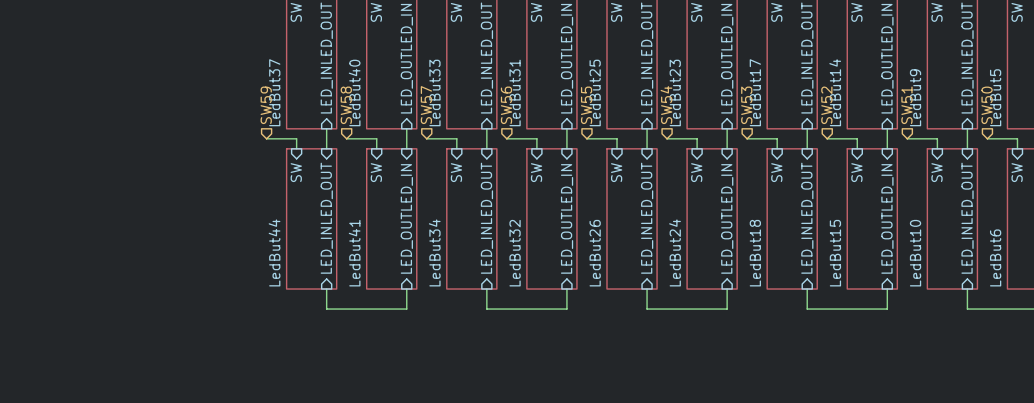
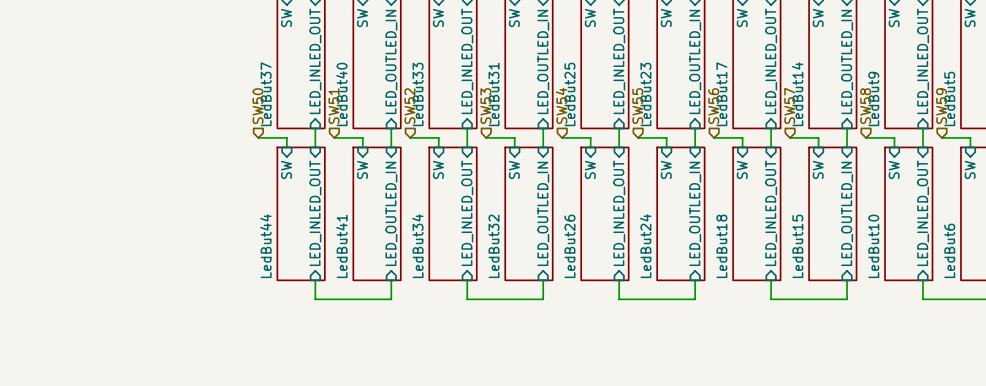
hierarchical label: SW59 (266, 105) -> SW50 (258, 106)
hierarchical label: SW58 (346, 105) -> SW51 (333, 106)
hierarchical label: SW57 (426, 105) -> SW52 (409, 106)
hierarchical label: SW56 (506, 105) -> SW53 (485, 106)
hierarchical label: SW55 (586, 105) -> SW54 (561, 105)
hierarchical label: SW54 (666, 105) -> SW55 (637, 106)
hierarchical label: SW53 (746, 105) -> SW56 (713, 106)
hierarchical label: SW52 (826, 105) -> SW57 (789, 105)
hierarchical label: SW51 (906, 105) -> SW58 (865, 106)
hierarchical label: SW50 (987, 105) -> SW59 (941, 106)

